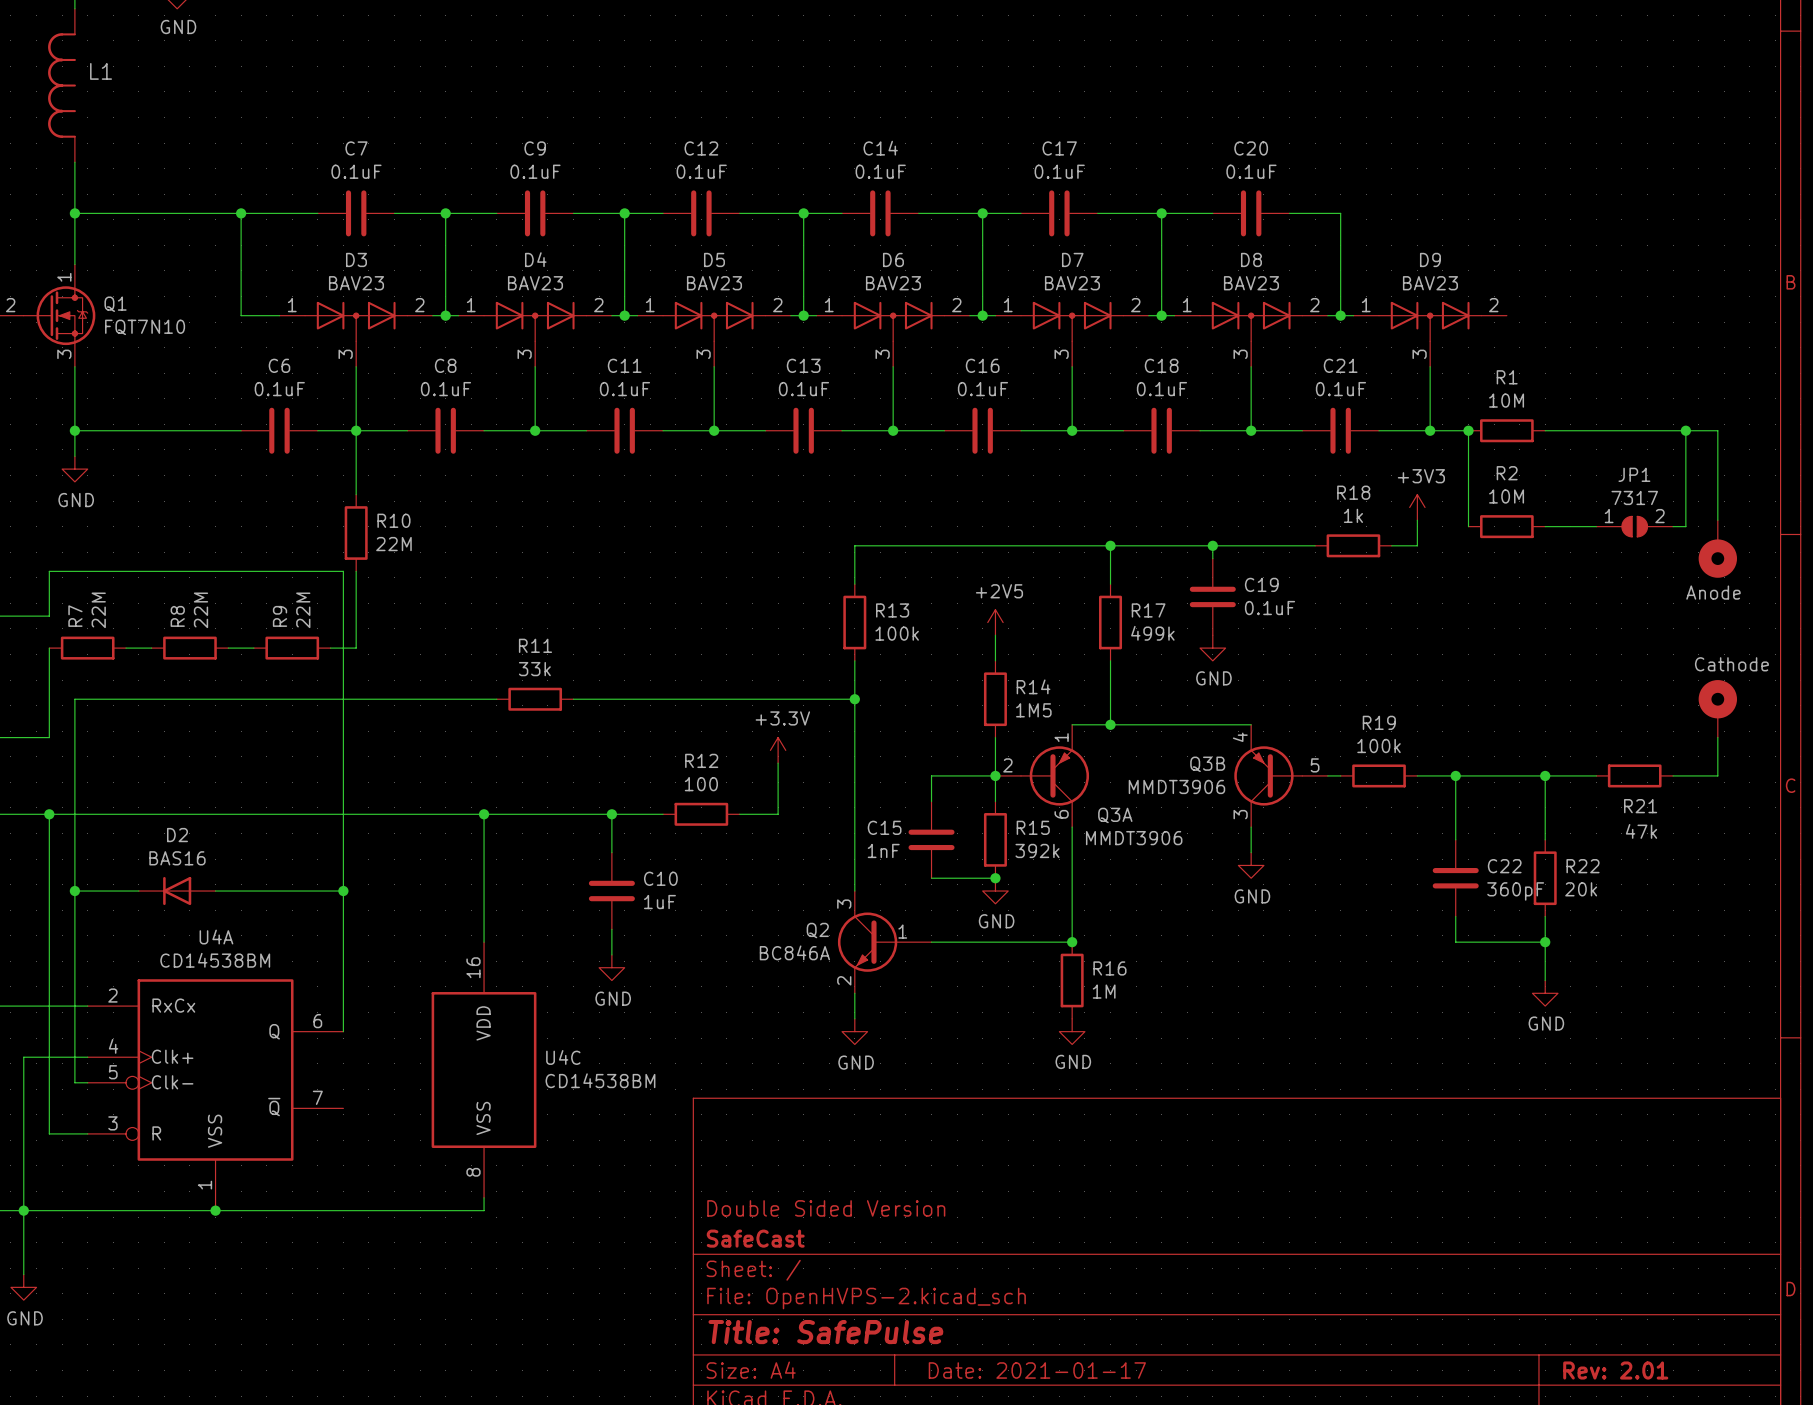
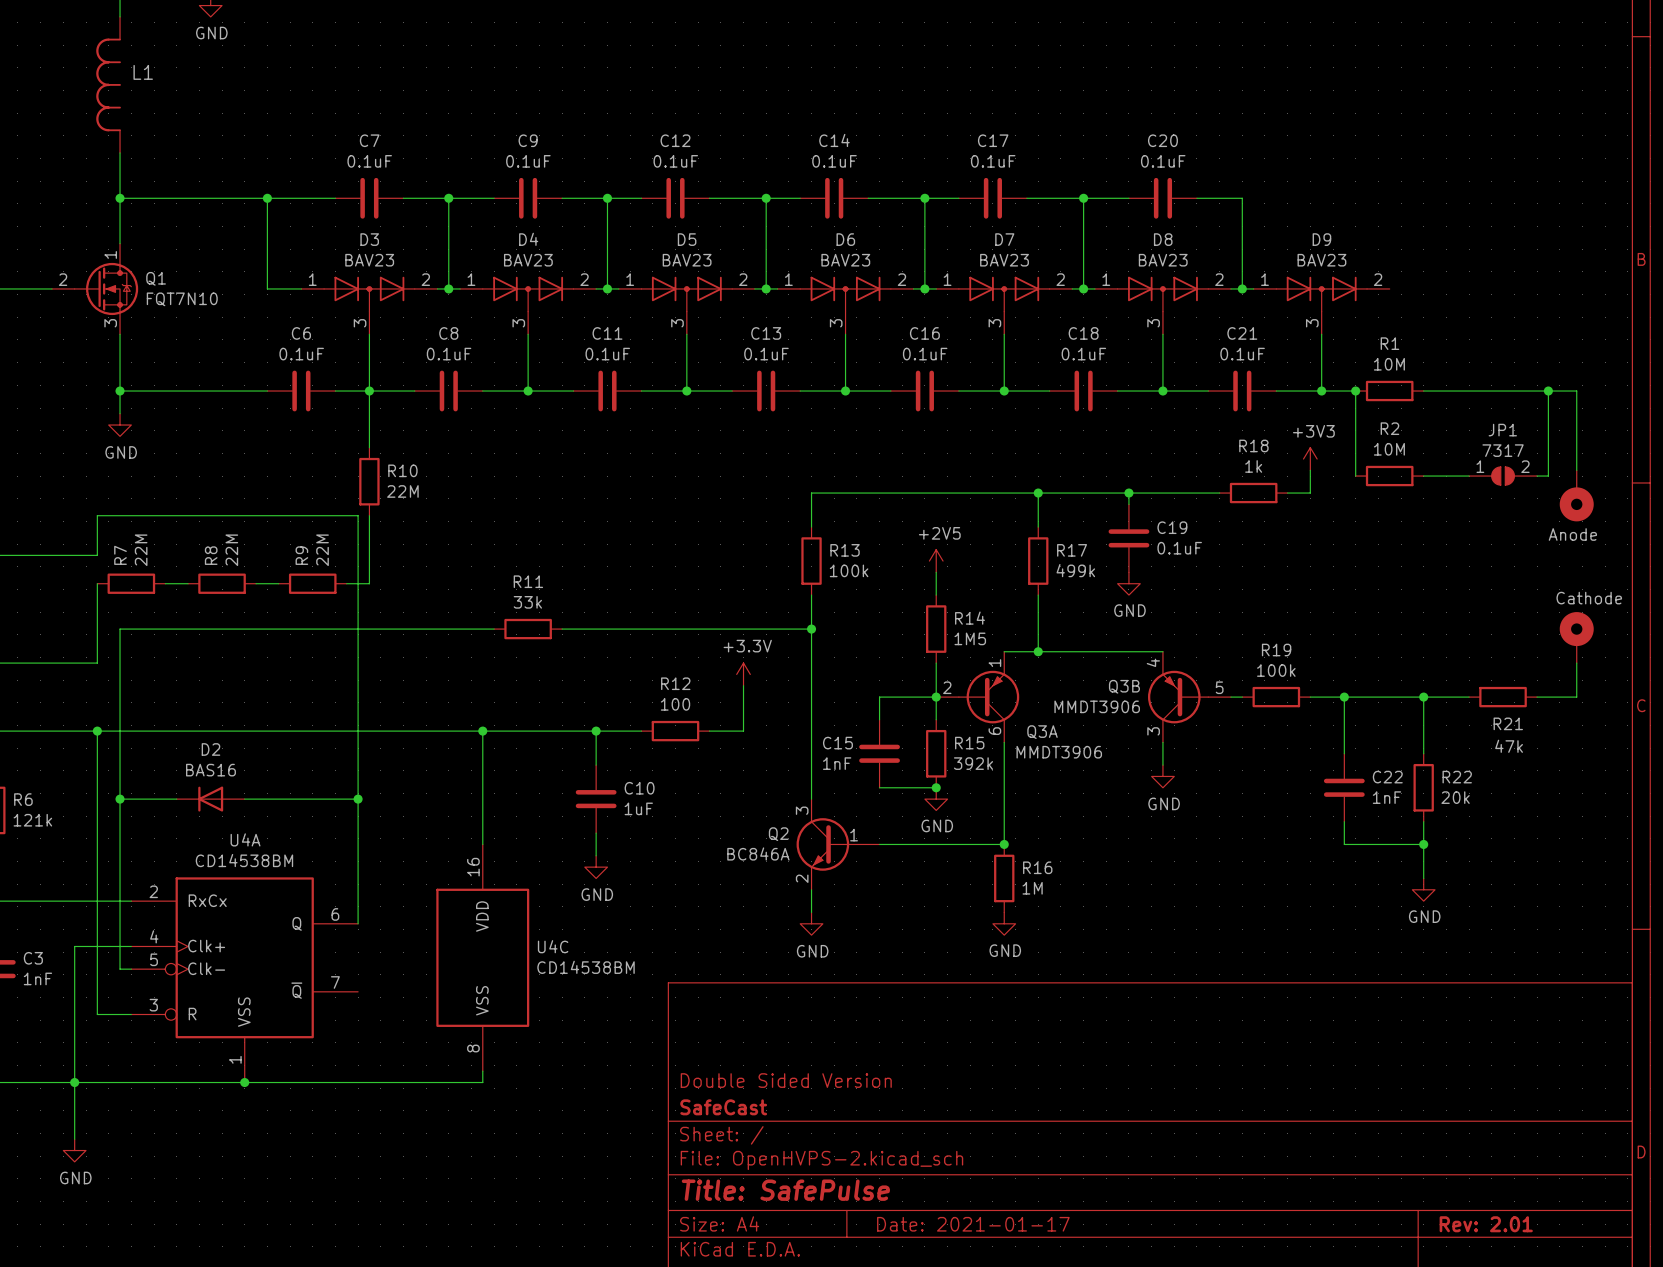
C22 value: 360pF (1515, 891) -> 1nF (1386, 797)

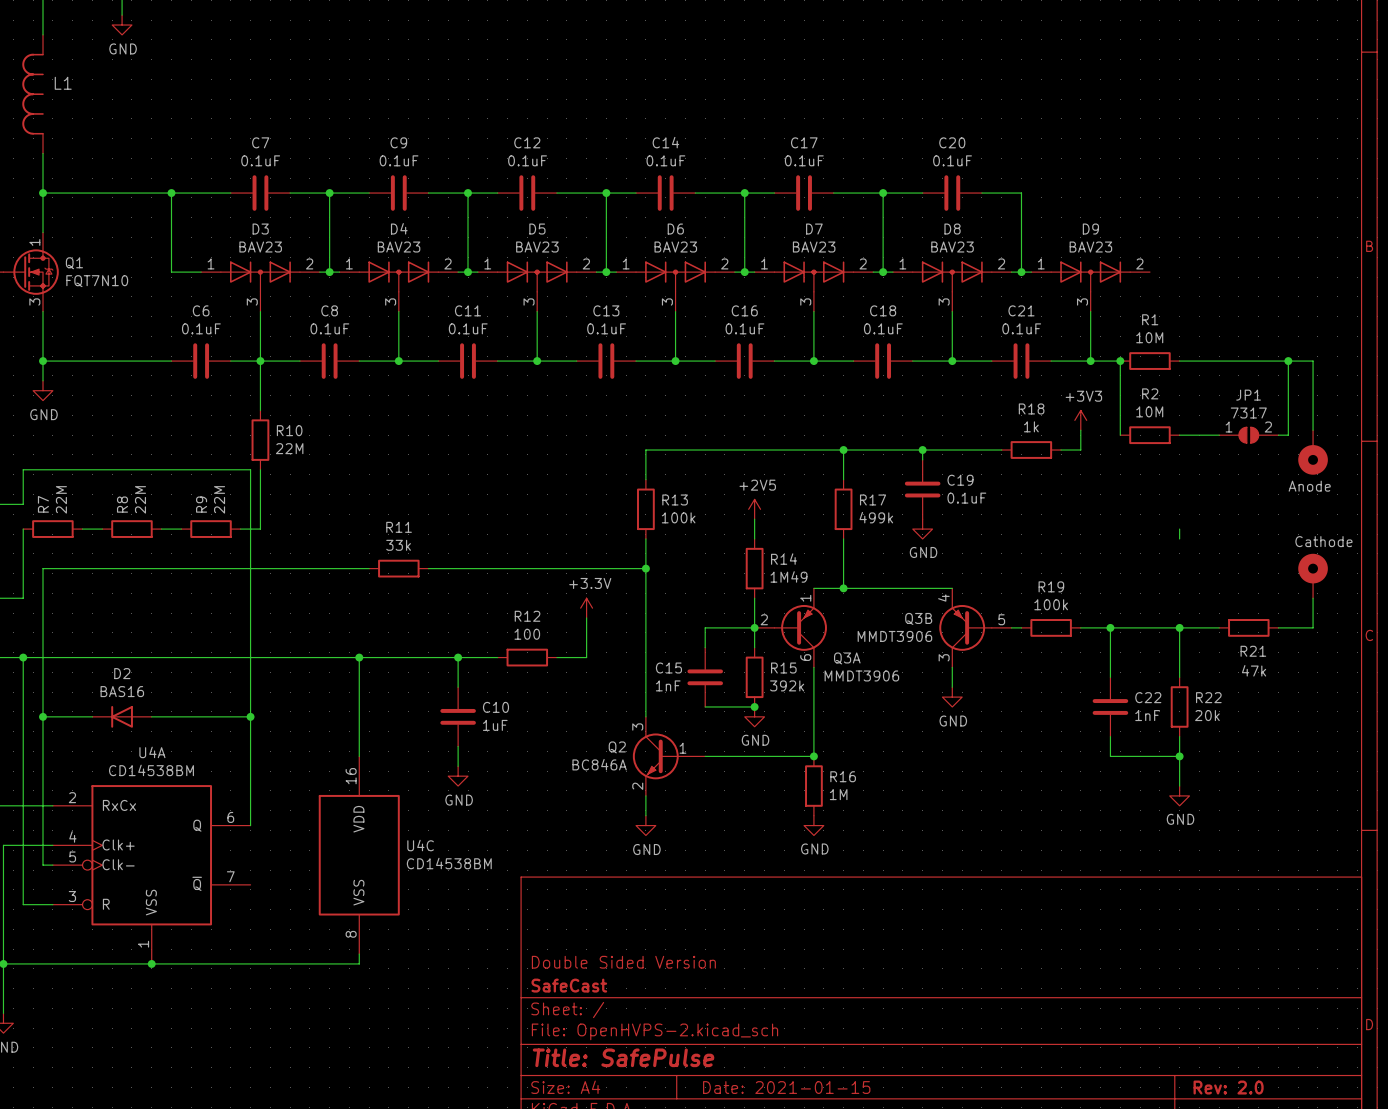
wire: none -> (1179, 529) (1179, 538)
R14 value: 1M5 (970, 638) -> 1M49 (789, 576)
title block: Date: 2021-01-17 (973, 1224) -> Date: 2021-01-15 (786, 1087)
title block: Rev: 2.01 (1486, 1224) -> Rev: 2.0 (1228, 1087)

